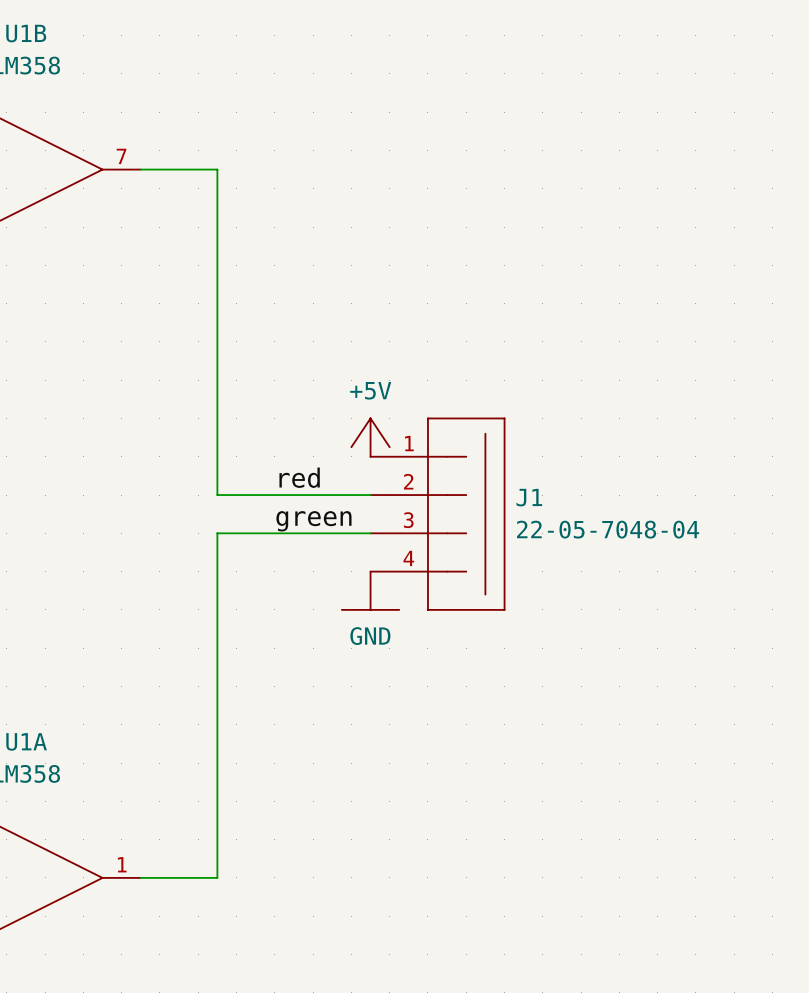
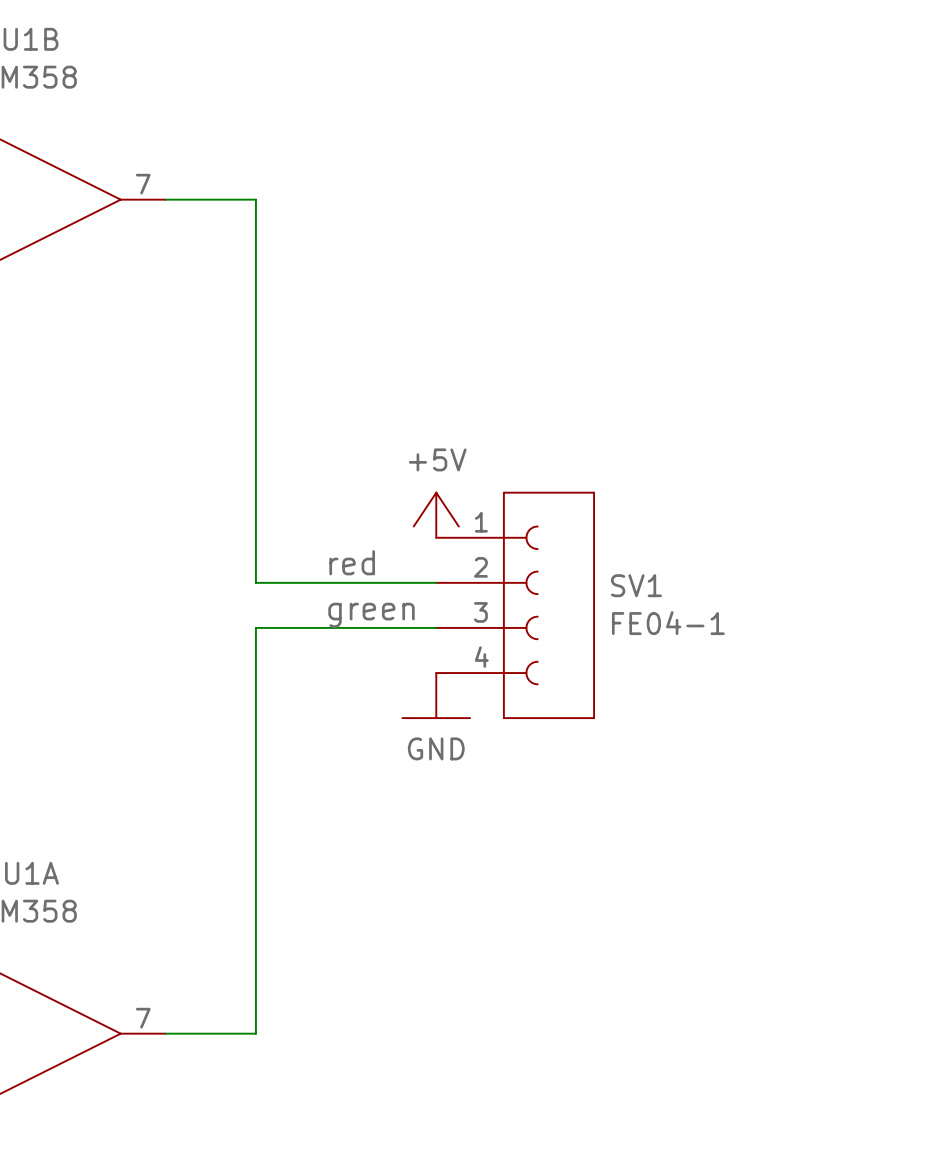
J1: 22-05-7048-04 (437, 514) -> none
SV1: none -> FE04-1 (515, 605)
U1A pin number: 1 (122, 864) -> 7 (143, 1018)

